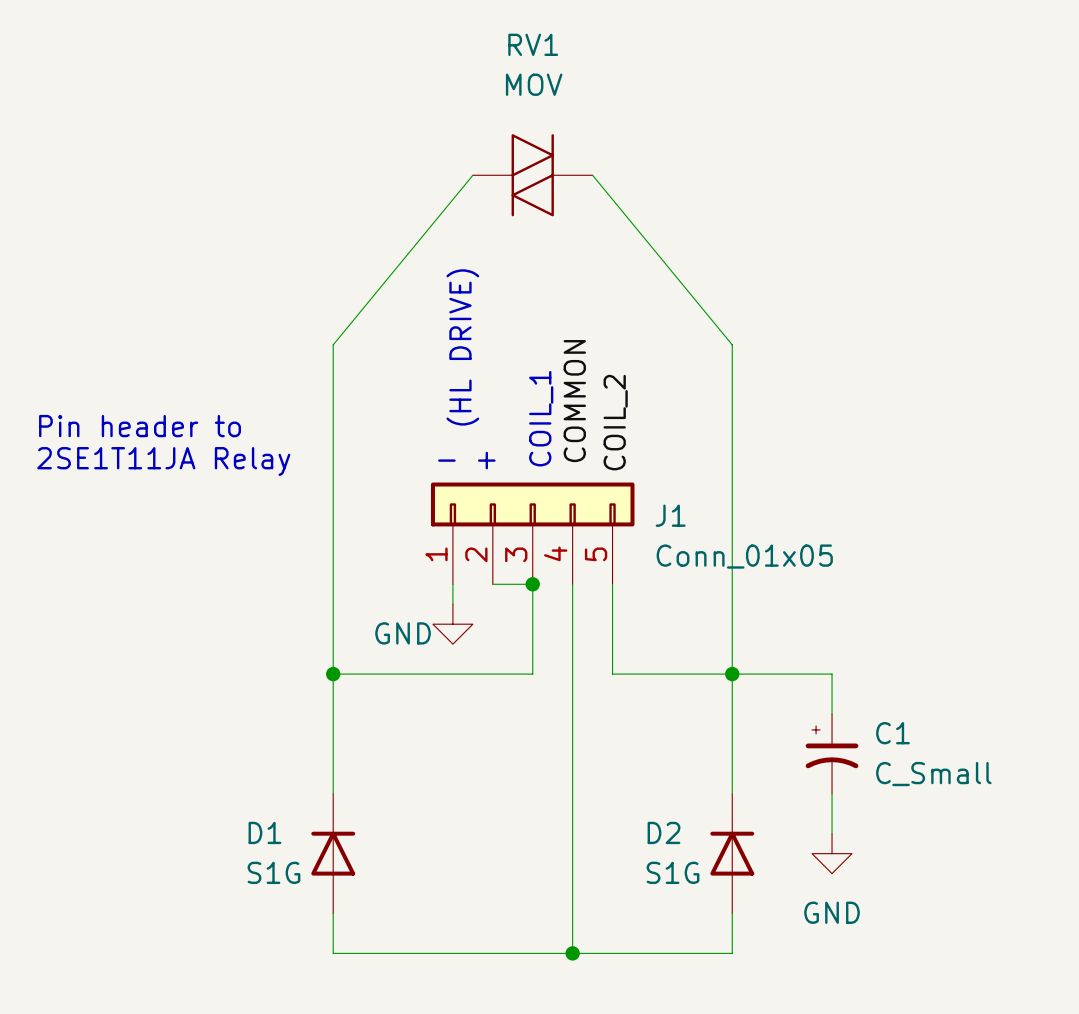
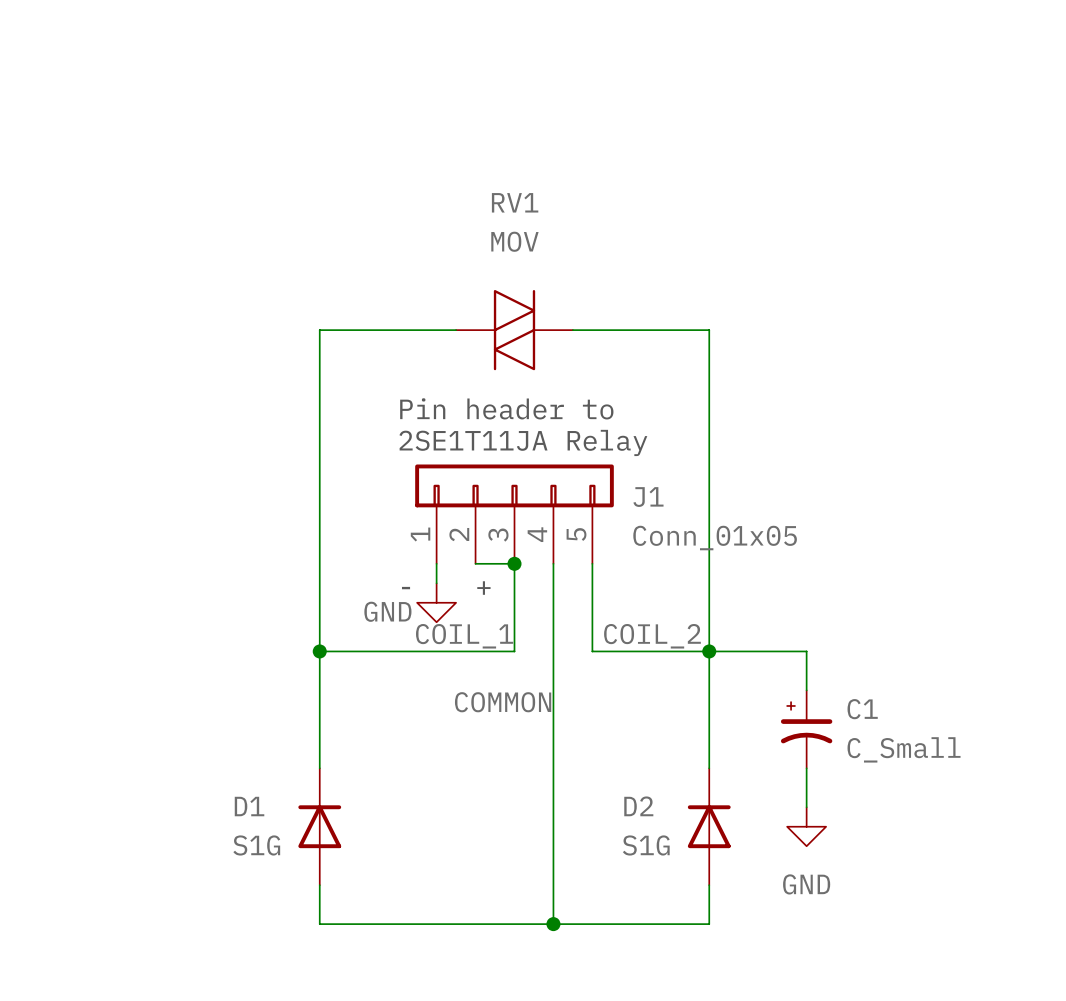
wire: (472, 175) (333, 344) -> (456, 330) (319, 330)
RV1 position: (532, 175) -> (514, 330)
wire: (592, 175) (732, 344) -> (572, 330) (709, 330)
text: (HL DRIVE) (462, 347) -> none
label: COMMON (574, 401) -> none
text: COIL_1 (541, 418) -> none
label rotation: 0° (615, 422) -> 90° clockwise (652, 636)
label position: COIL_2 (615, 422) -> COIL_2 (652, 636)
text position: Pin header to (140, 426) -> Pin header to (506, 408)
text position: - (446, 460) -> - (406, 588)
text position: + (486, 460) -> + (483, 588)
text position: 2SE1T11JA Relay (163, 461) -> 2SE1T11JA Relay (523, 442)
label: none -> COIL_1 (464, 636)
label: none -> COMMON (503, 702)

